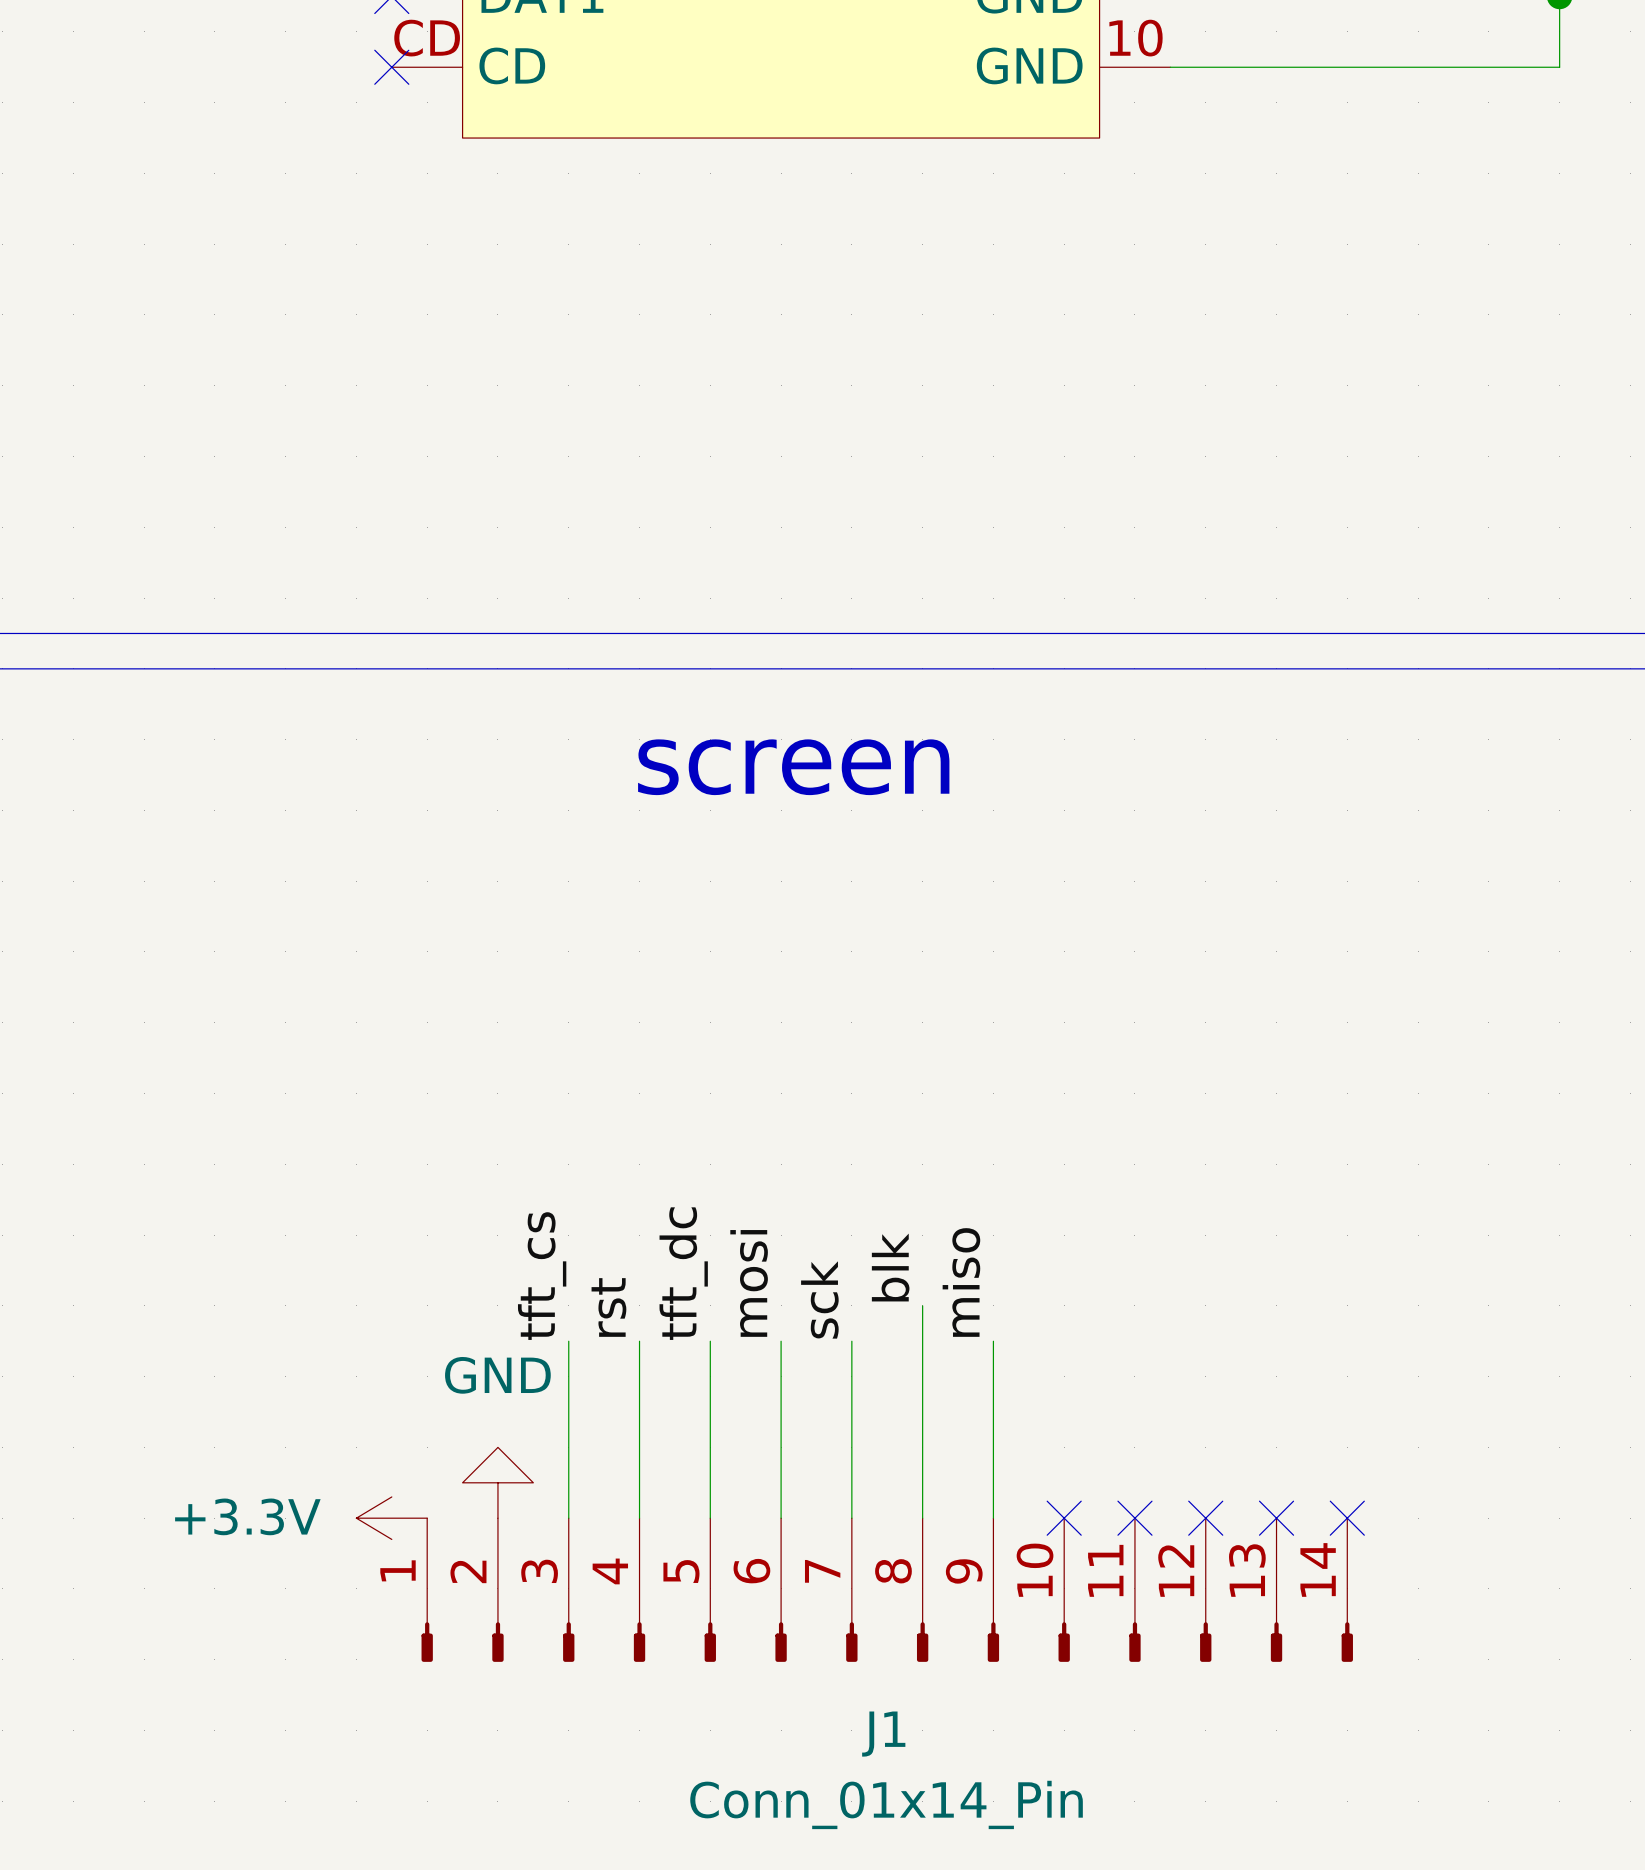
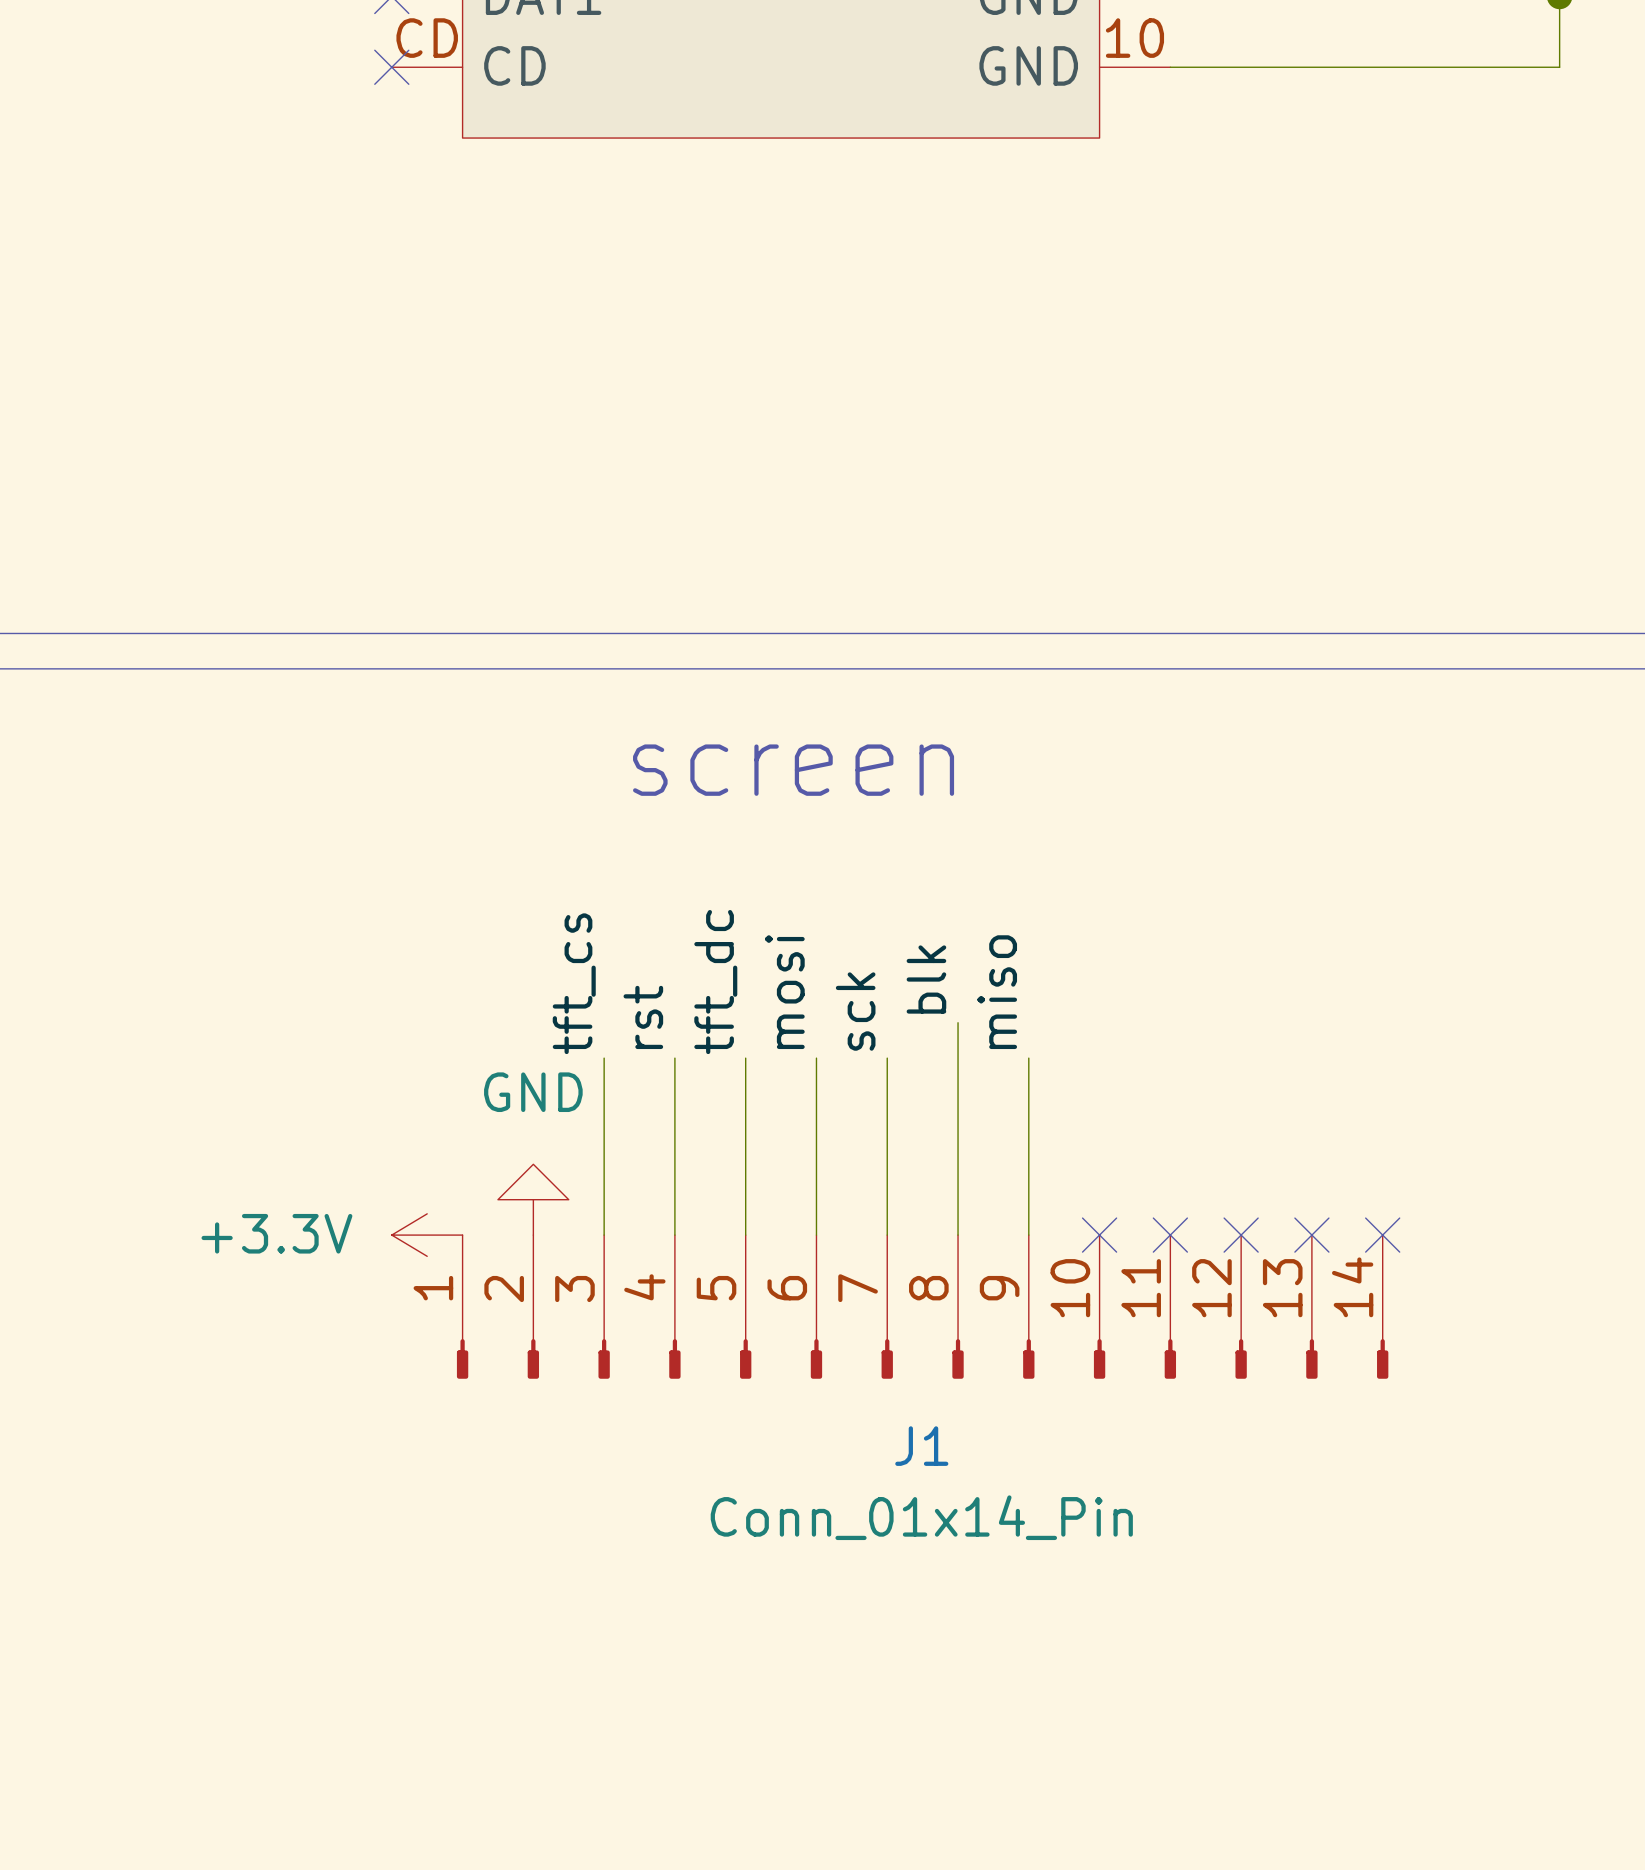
no-connect mark: none -> (1099, 1235)
no-connect mark: none -> (1170, 1235)
no-connect mark: none -> (1241, 1235)
no-connect mark: none -> (1311, 1235)
no-connect mark: none -> (1382, 1235)
label position: blk (890, 1267) -> blk (926, 979)
label position: tft_dc (683, 1273) -> tft_dc (715, 982)
label position: tft_cs (542, 1276) -> tft_cs (574, 983)
label position: miso (961, 1282) -> miso (997, 992)
label position: mosi (749, 1283) -> mosi (784, 992)
label position: sck (819, 1299) -> sck (855, 1011)
wire: (922, 1305) (922, 1518) -> (958, 1022) (958, 1235)
label position: rst (608, 1307) -> rst (643, 1017)
wire: (568, 1341) (568, 1518) -> (604, 1058) (604, 1235)
wire: (639, 1341) (639, 1518) -> (674, 1058) (674, 1235)
wire: (710, 1341) (710, 1518) -> (745, 1058) (745, 1235)
wire: (781, 1341) (781, 1518) -> (816, 1058) (816, 1235)
wire: (851, 1341) (851, 1518) -> (887, 1058) (887, 1235)
wire: (993, 1341) (993, 1518) -> (1028, 1058) (1028, 1235)
power symbol position: GND (497, 1482) -> GND (533, 1199)
power symbol position: +3.3V (391, 1518) -> +3.3V (427, 1235)
no-connect mark: (1064, 1518) -> none
no-connect mark: (1134, 1518) -> none
no-connect mark: (1205, 1518) -> none
no-connect mark: (1276, 1518) -> none
no-connect mark: (1347, 1518) -> none
J1 position: (887, 1590) -> (922, 1306)

